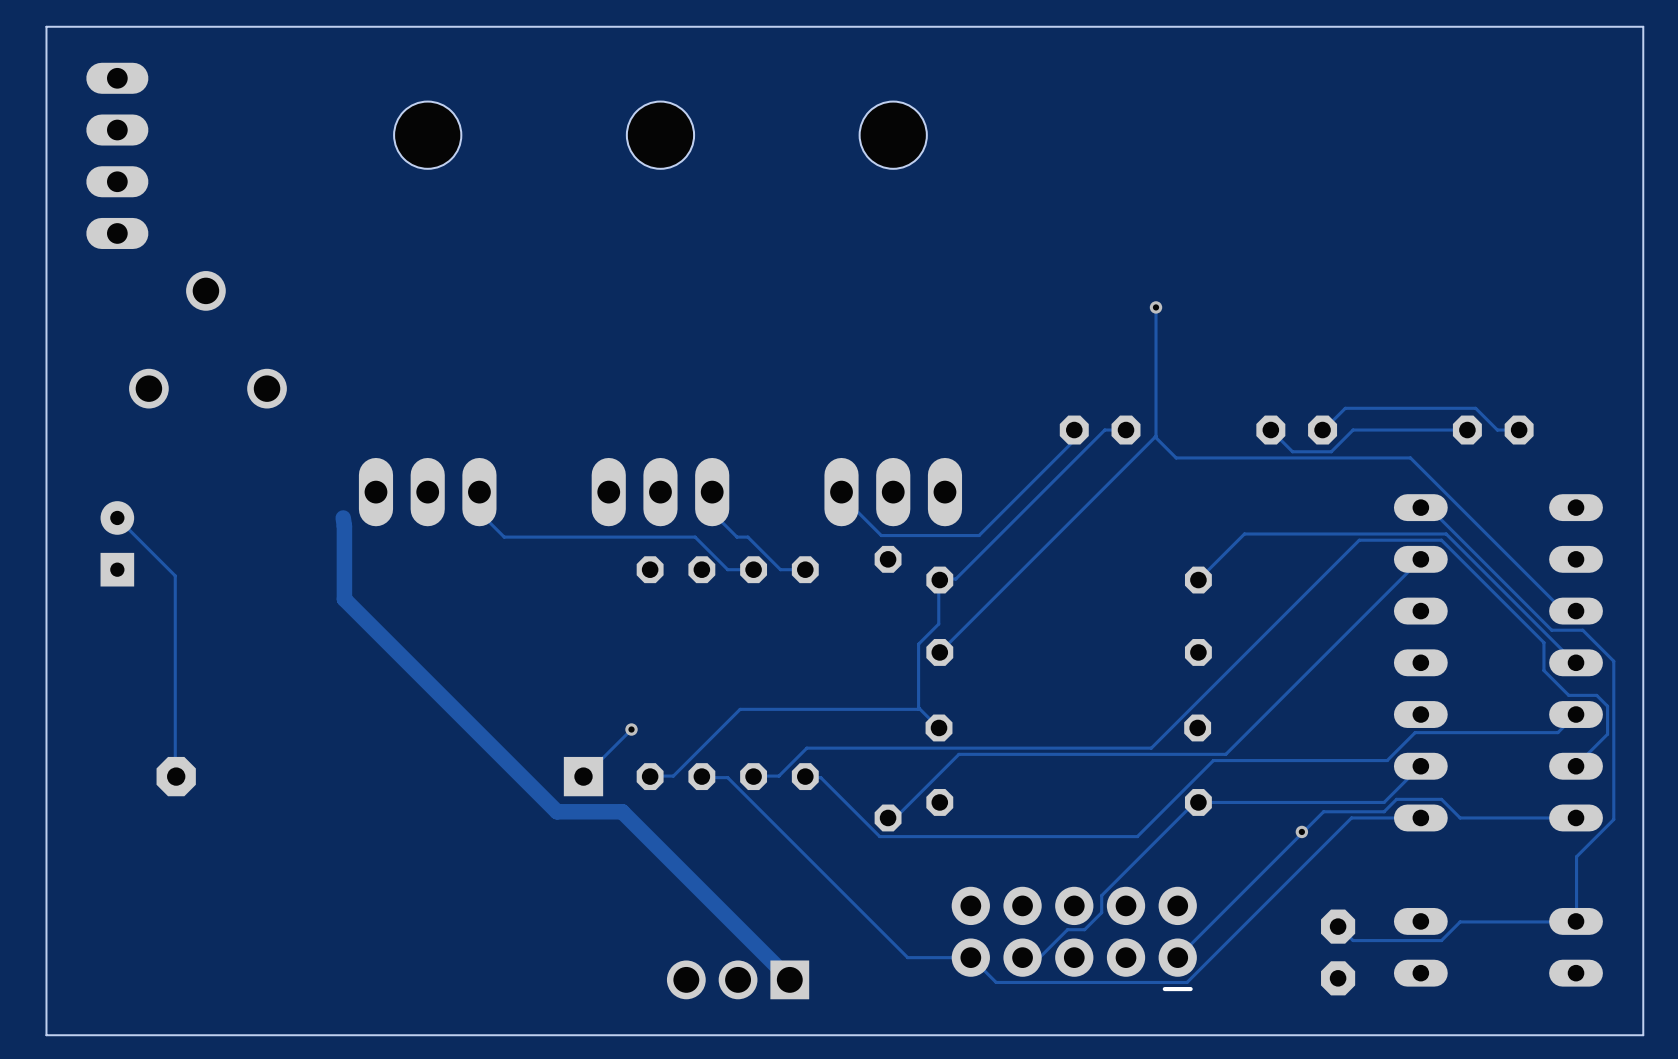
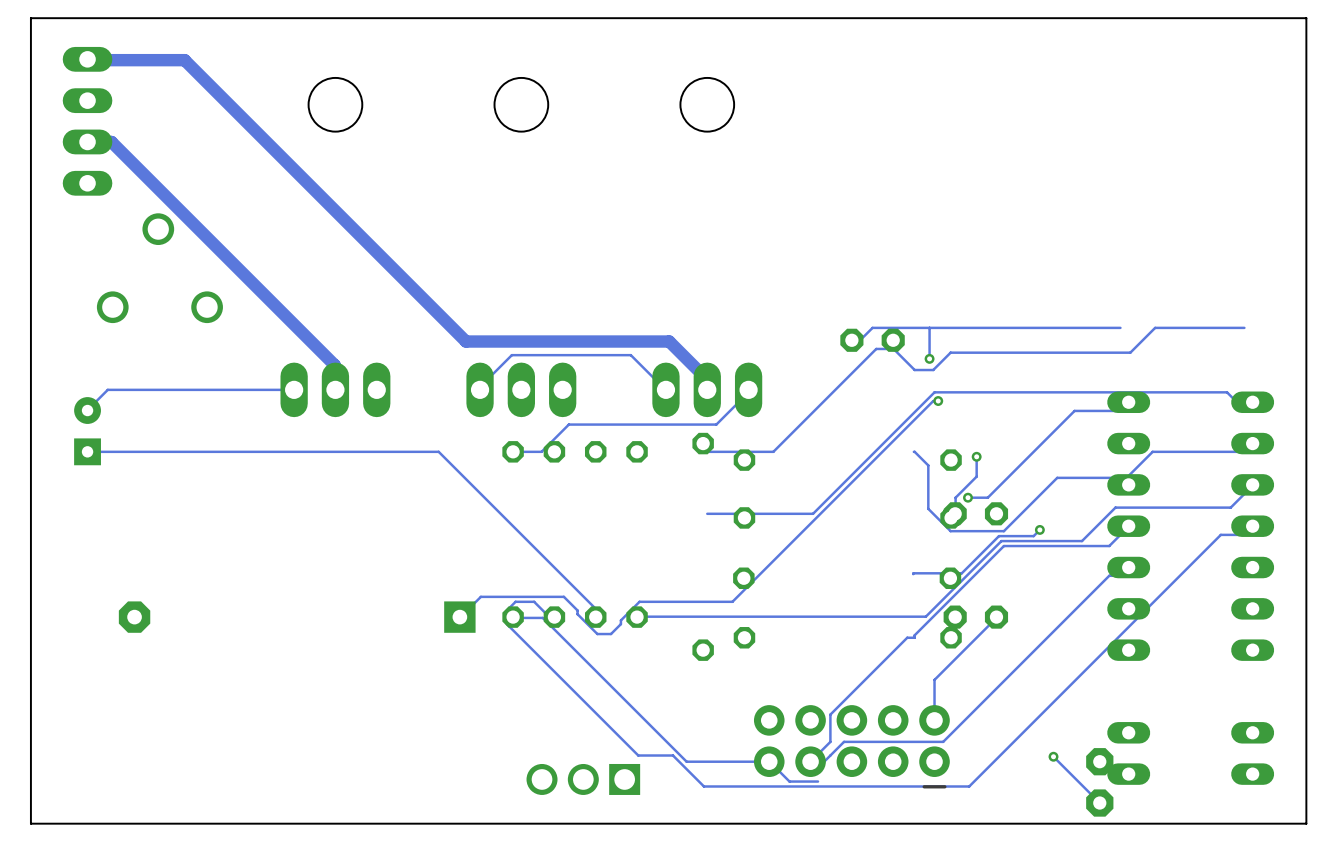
track: none -> (87, 59) (184, 60) (466, 341) (669, 341) (706, 378) (707, 389)
track: none -> (87, 141) (111, 141) (334, 365) (335, 389)
track: (1156, 307) (1156, 436) (939, 652) -> none
via: (1156, 307) -> none
track: none -> (929, 327) (929, 358)
track: none -> (1120, 327) (872, 327) (851, 348)
track: none -> (1244, 327) (1155, 327) (1130, 352) (950, 352) (933, 370) (914, 370) (893, 348) (876, 348) (773, 451) (707, 451)
track: (1074, 430) (1073, 440) (979, 535) (904, 535) -> (748, 389) (748, 392) (716, 424)
track: (1126, 430) (1104, 430) (955, 579) (938, 580) (938, 624) (918, 644) (918, 707) (938, 727) -> none
part: (1296, 430) -> none
track: (1467, 430) (1353, 430) (1331, 451) (1292, 451) (1270, 430) -> none
part: (1493, 430) -> none
track: (1519, 430) (1497, 430) (1475, 408) (1345, 408) (1322, 430) -> none
track: (1155, 437) (1176, 457) (1410, 457) (1562, 610) (1576, 611) -> none
via: none -> (929, 358)
track: (479, 492) (479, 512) (504, 537) (695, 537) (727, 569) (753, 569) -> none
track: (712, 492) (712, 512) (737, 537) (747, 537) (780, 569) (805, 569) -> none
track: (841, 492) (842, 496) (881, 535) -> (521, 451) (541, 451) (568, 424) (697, 424)
track: none -> (665, 389) (630, 355) (511, 355) (480, 386) (480, 389)
via: none -> (938, 401)
track: (1420, 507) (1429, 507) (1551, 630) (1582, 630) (1613, 661) (1613, 819) (1576, 856) (1576, 920) (1574, 921) (1460, 921) (1441, 940) (1353, 940) (1338, 926) -> none
track: (117, 517) (175, 575) (176, 776) -> (87, 410) (107, 389) (294, 389)
track: (343, 517) (344, 599) (557, 811) (622, 811) (789, 979) -> none
track: none -> (1120, 410) (1074, 410) (987, 497) (967, 497)
track: none -> (1244, 410) (1227, 392) (934, 392) (813, 513) (707, 513)
track: (1420, 559) (1225, 754) (958, 754) (895, 817) (888, 817) -> none
track: none -> (87, 451) (438, 451) (603, 617)
track: none -> (1244, 451) (1152, 451) (1126, 477) (1057, 477) (1003, 531) (950, 531) (928, 508) (928, 465) (913, 451)
track: none -> (976, 456) (976, 476) (955, 497) (955, 513)
via: none -> (976, 456)
track: (1198, 580) (1244, 534) (1446, 534) (1576, 662) -> none
track: none -> (1244, 493) (1230, 507) (1115, 507) (1082, 541) (1001, 541) (925, 616) (645, 617)
via: none -> (967, 497)
part: none -> (975, 513)
track: none -> (1039, 529) (1033, 536) (998, 536) (961, 573) (913, 574)
via: none -> (1039, 529)
track: none -> (1120, 534) (1109, 546) (1003, 546) (914, 635) (914, 637) (907, 637) (830, 714) (830, 741) (810, 761)
track: none -> (1244, 534) (1220, 534) (969, 786) (703, 786) (672, 755) (638, 755) (506, 624) (506, 610) (515, 601) (534, 601) (549, 616) (562, 617)
track: (919, 708) (740, 709) (673, 776) (650, 776) -> none
track: (1576, 714) (1557, 732) (1415, 732) (1387, 760) (1213, 760) (1137, 836) (879, 836) (820, 777) (805, 776) -> none
track: (631, 729) (609, 751) -> (938, 401) (933, 401) (732, 601) (639, 601) (620, 620) (620, 624) (611, 634) (597, 634) (563, 596) (480, 596)
via: (631, 729) -> none
track: (1420, 766) (1384, 802) (1194, 802) (1101, 895) (1101, 912) (1084, 929) (1067, 929) (1064, 932) -> (1120, 575) (1109, 575) (943, 741) (844, 741)
track: (1576, 766) (1607, 734) (1607, 706) (1596, 695) (1568, 695) (1543, 670) (1543, 642) (1441, 540) (1359, 540) (1151, 748) (806, 748) (778, 776) (753, 776) -> none
track: (701, 776) (727, 777) (907, 957) -> (521, 617) (542, 617) (686, 761) (718, 761)
part: none -> (975, 617)
track: none -> (996, 617) (934, 679) (934, 720)
track: (1420, 817) (1351, 817) (1187, 982) (1031, 982) -> none
track: (1576, 817) (1460, 817) (1441, 799) (1396, 799) (1384, 811) (1323, 811) (1177, 957) -> none
via: (1301, 831) -> none
track: none -> (1053, 756) (1099, 803)
via: none -> (1053, 756)
part position: (1338, 952) -> (1099, 782)

